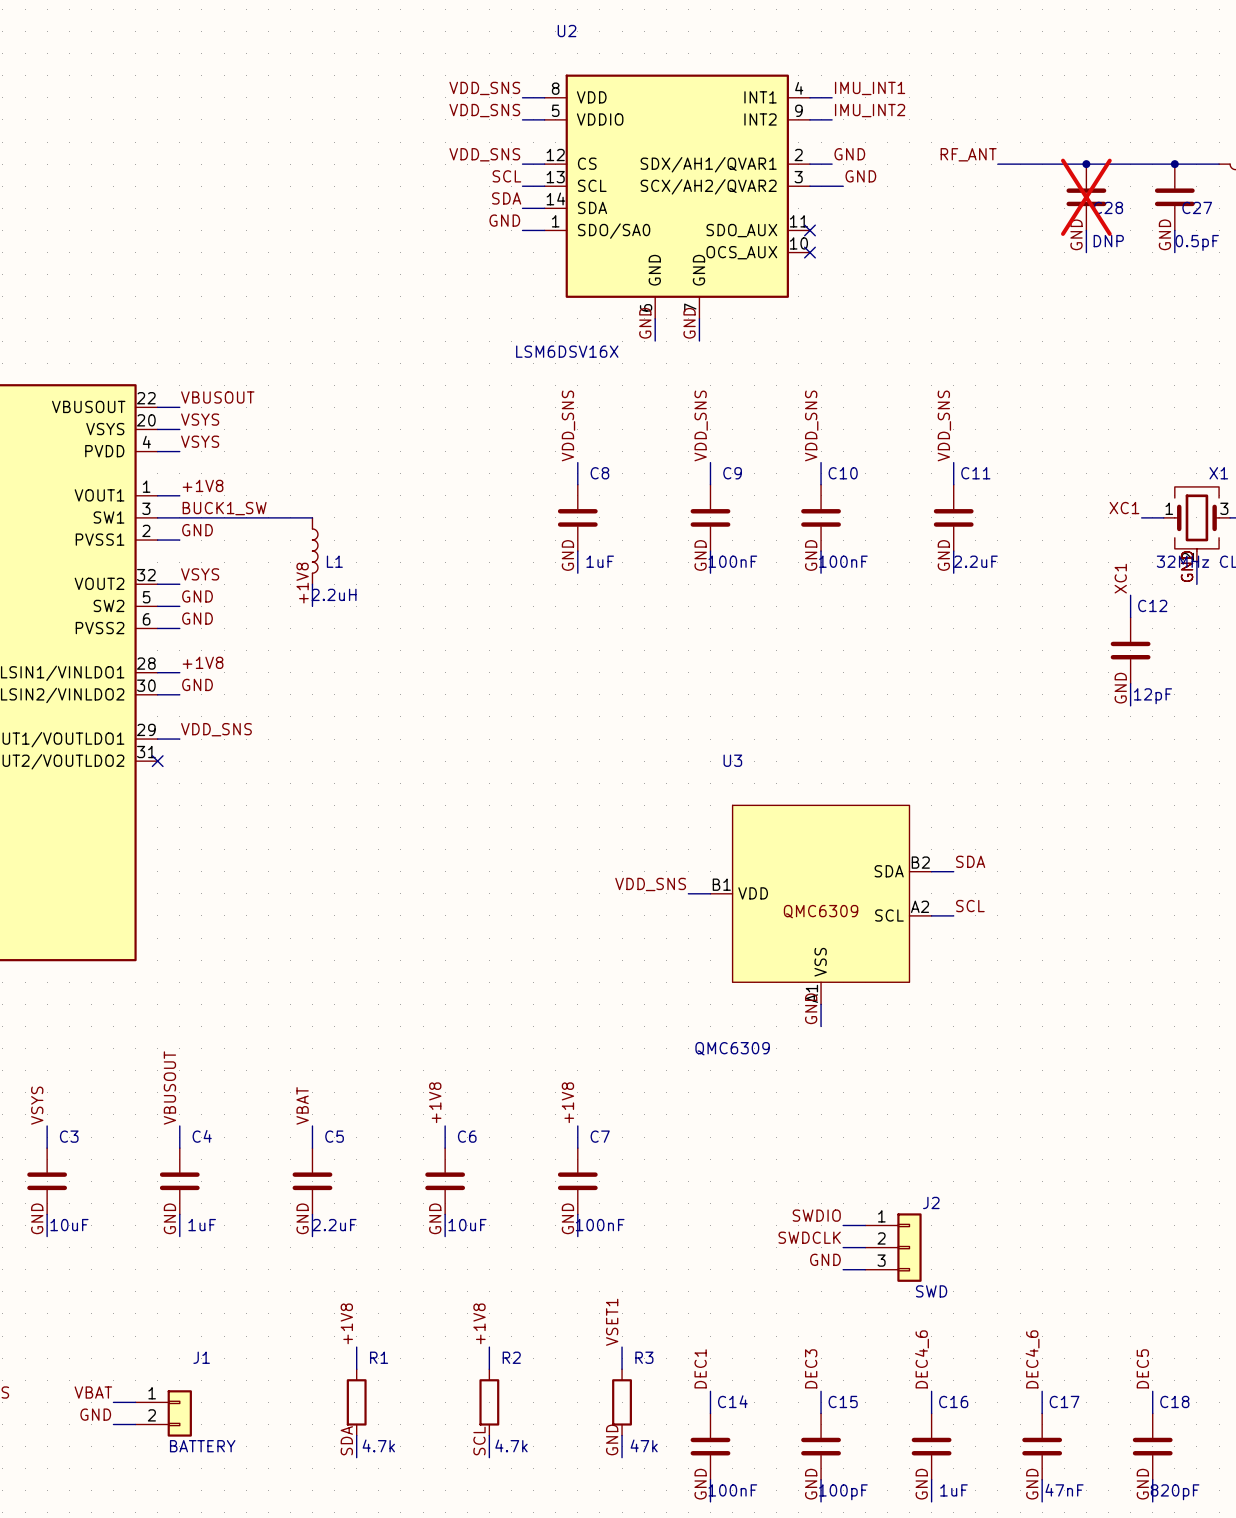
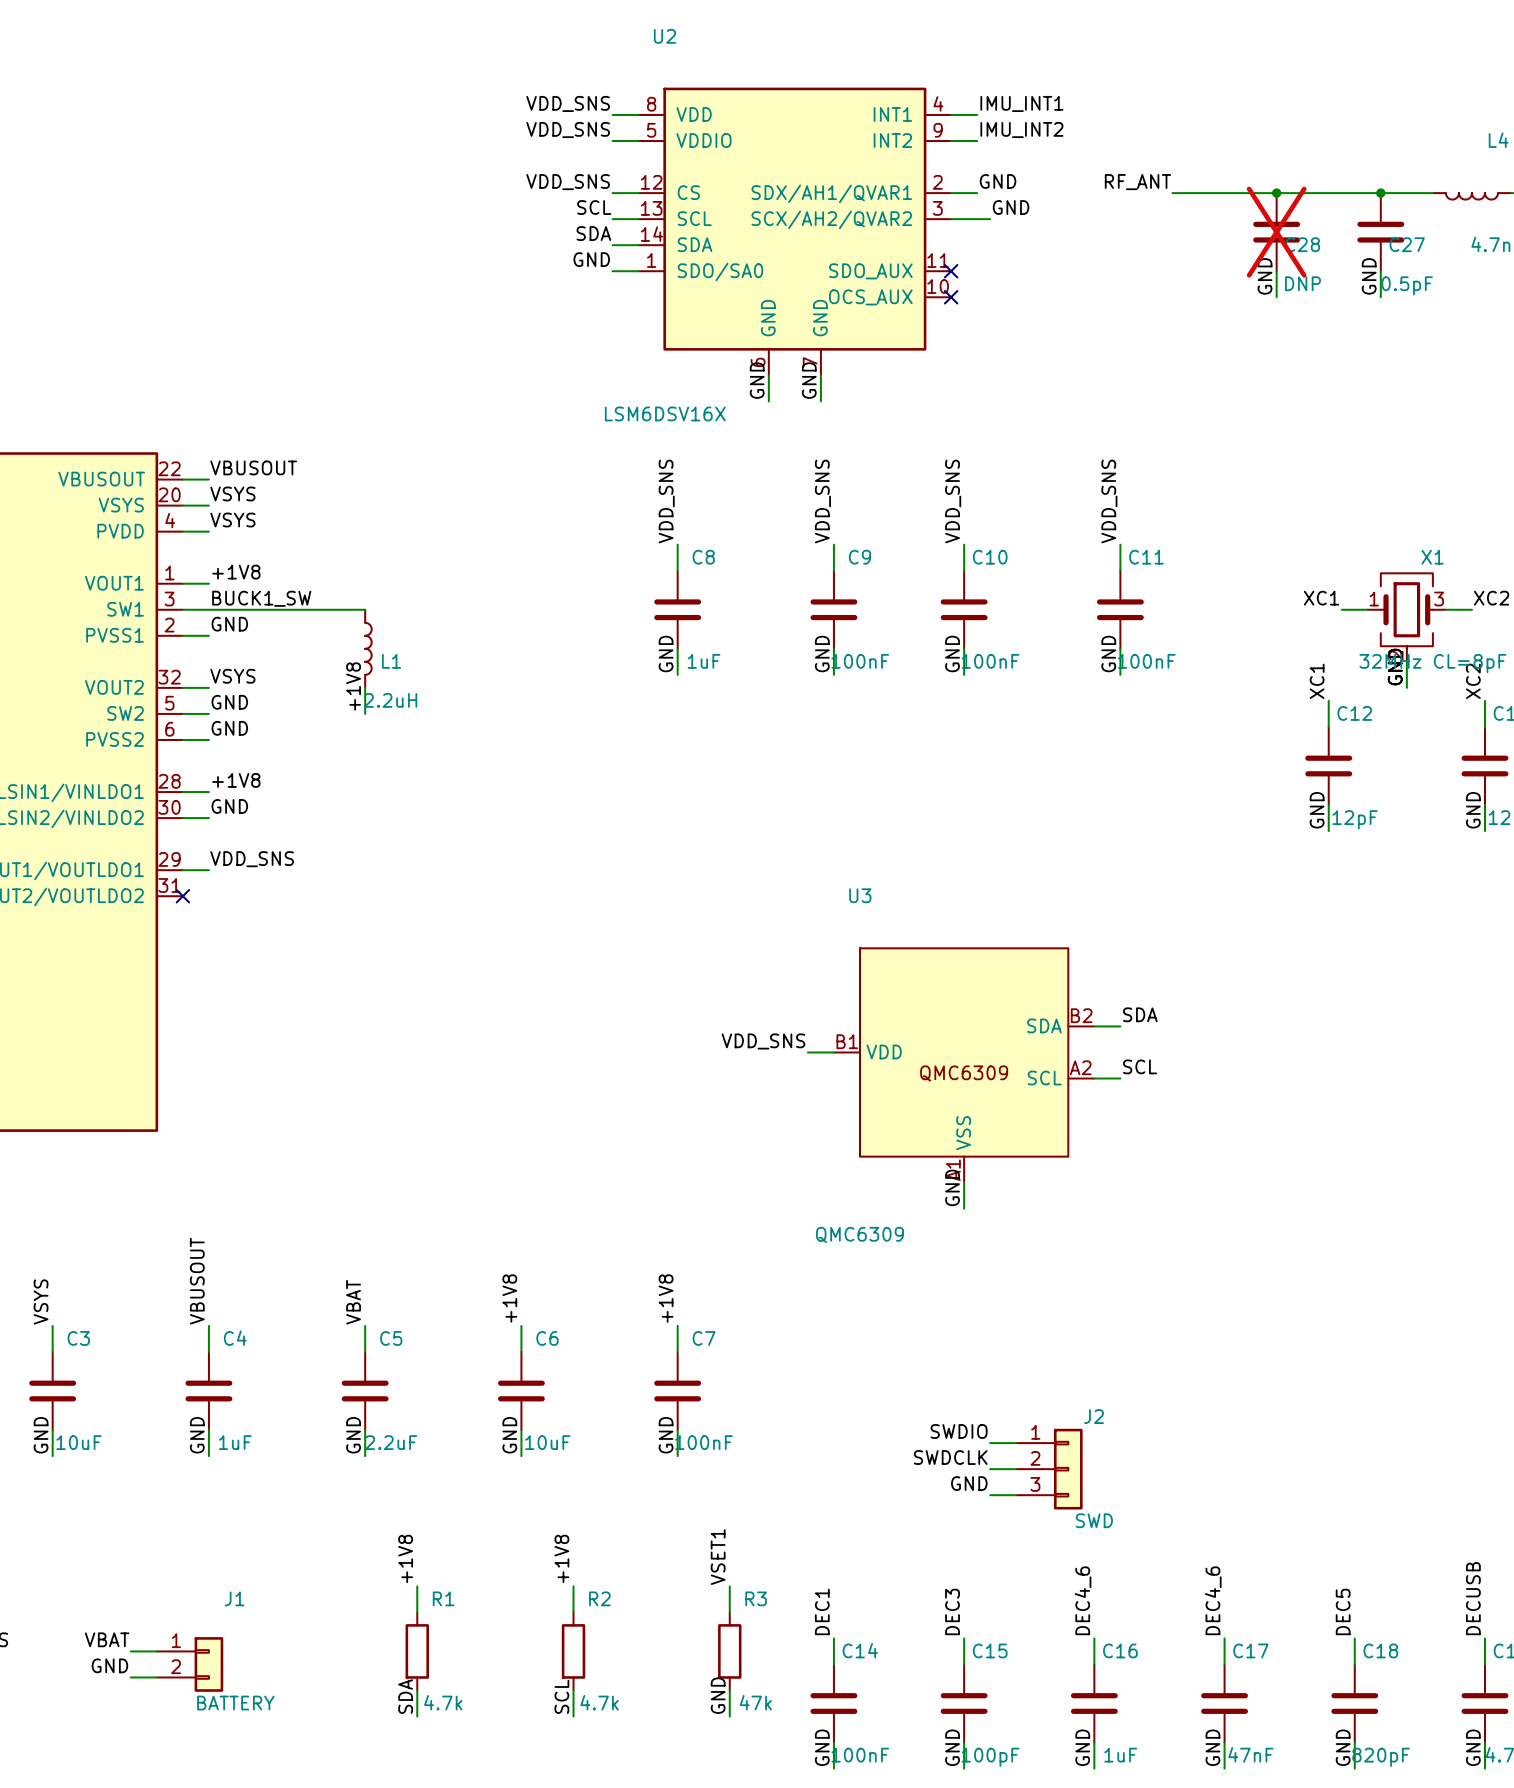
C11 value: 2.2uF (975, 561) -> 100nF (1146, 661)

